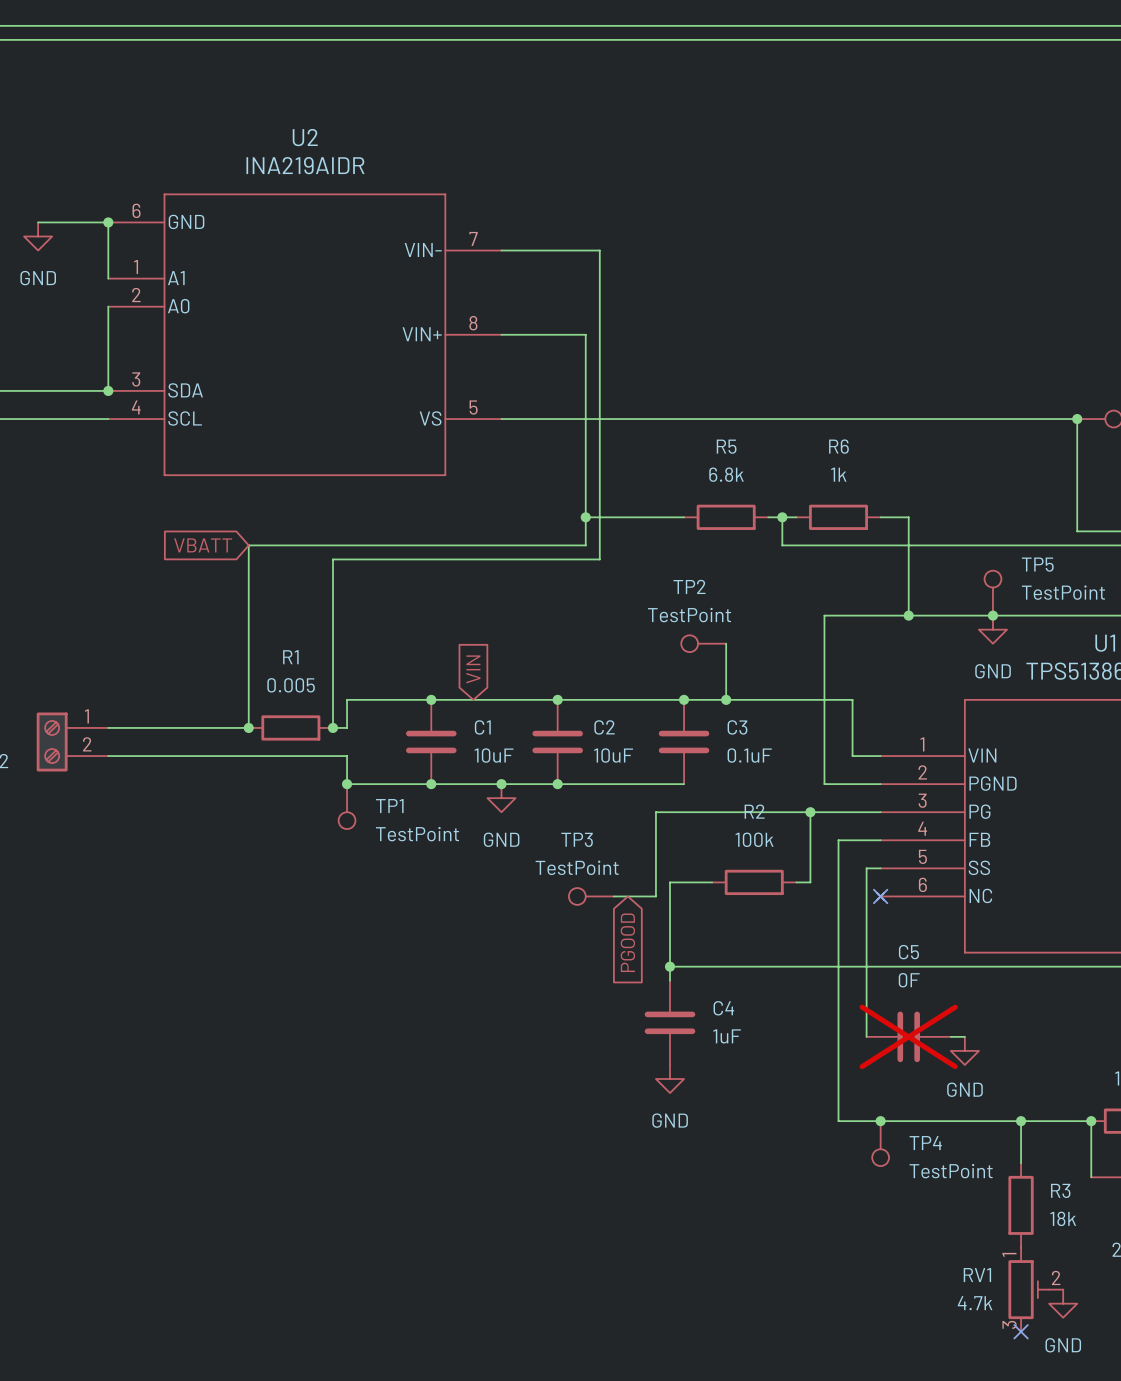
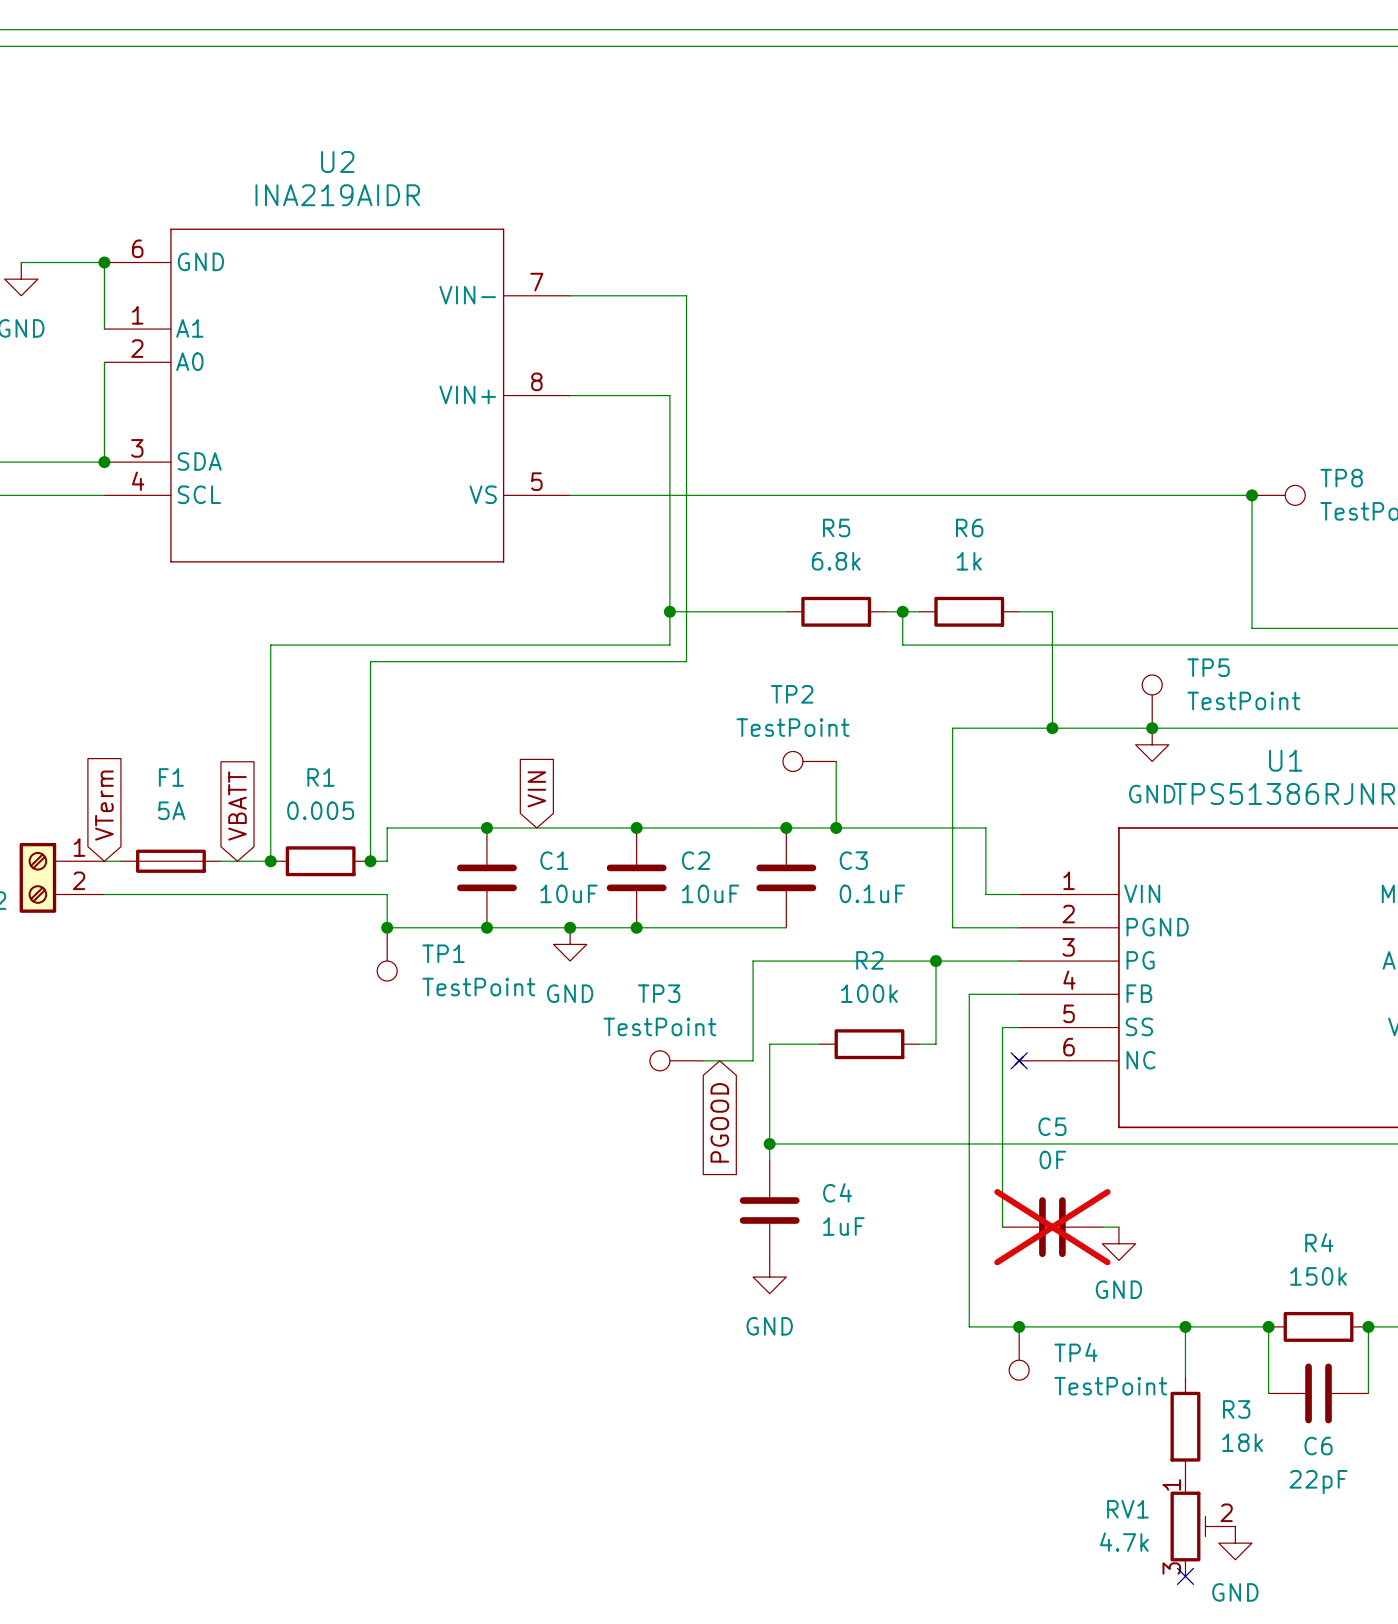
global label rotation: 0° (203, 545) -> 90° clockwise (237, 805)
global label position: VBATT (203, 545) -> VBATT (237, 805)
global label: none -> VTerm (104, 805)
F1: none -> 5A (170, 861)

